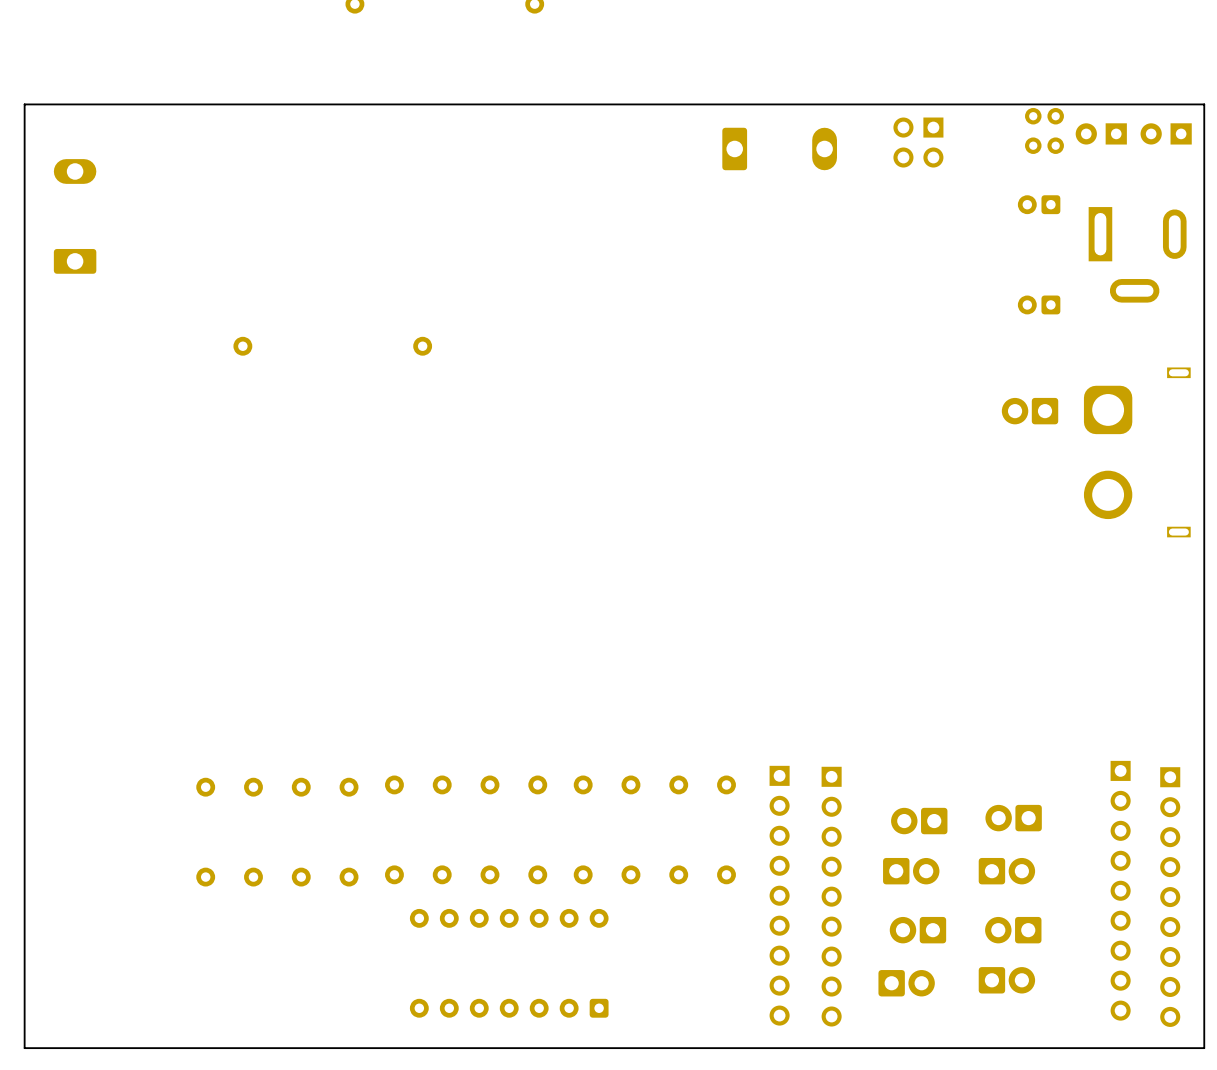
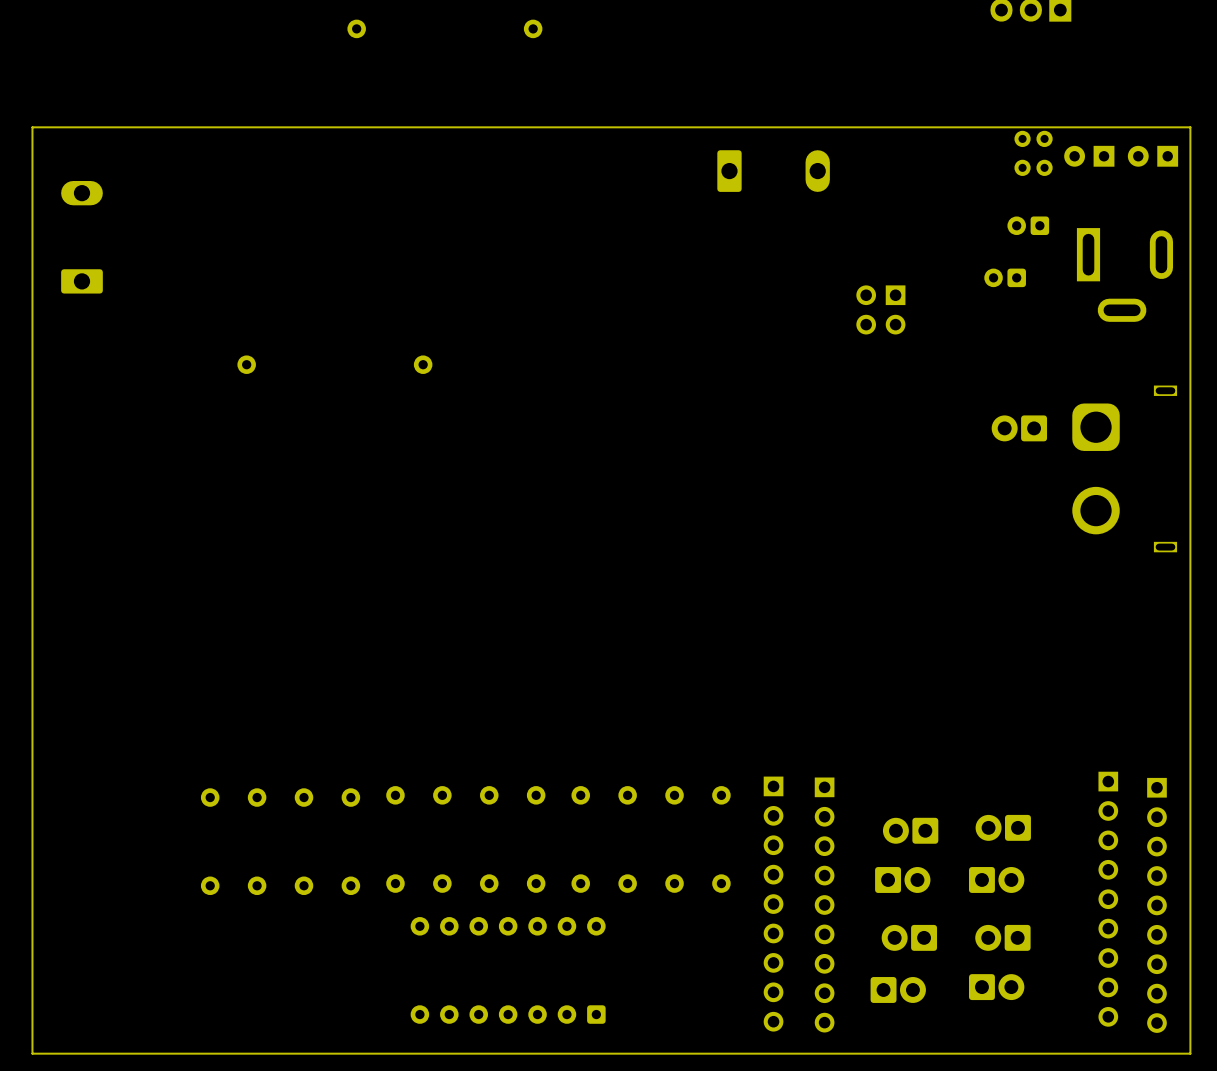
part position: (918, 142) -> (880, 309)
part position: (1039, 304) -> (1005, 277)

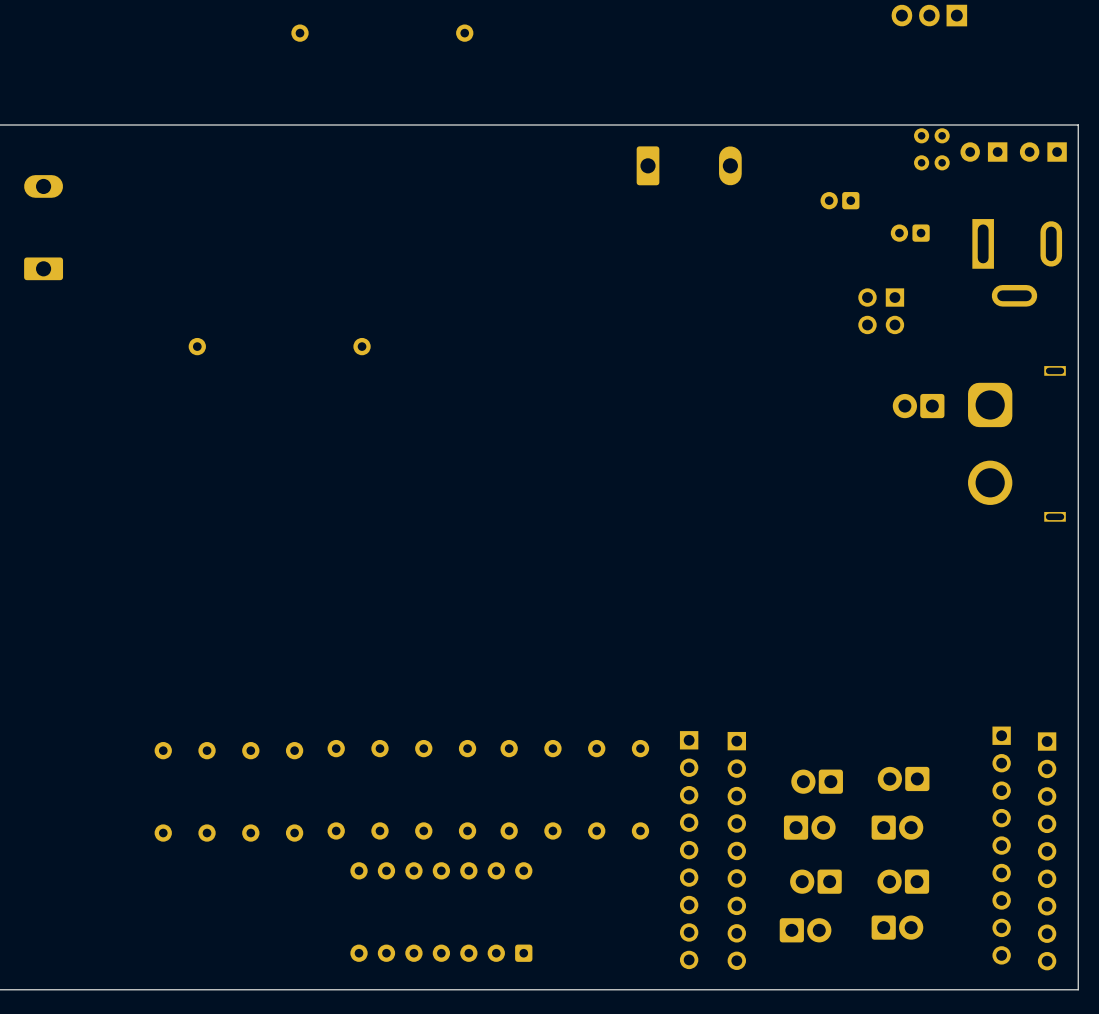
part: none -> (839, 200)
part: (1028, 225) -> none
part: none -> (910, 233)
part: (1005, 277) -> none
part position: (880, 309) -> (881, 311)

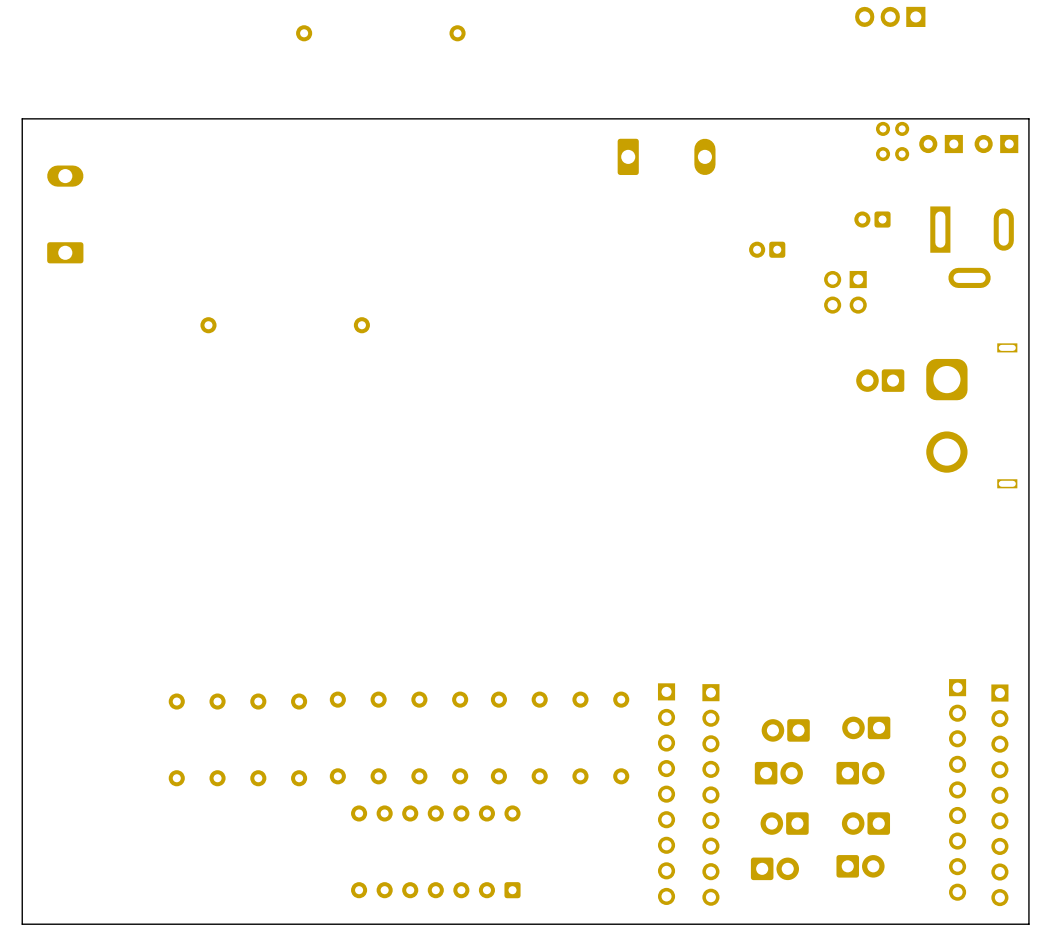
part position: (839, 200) -> (767, 249)

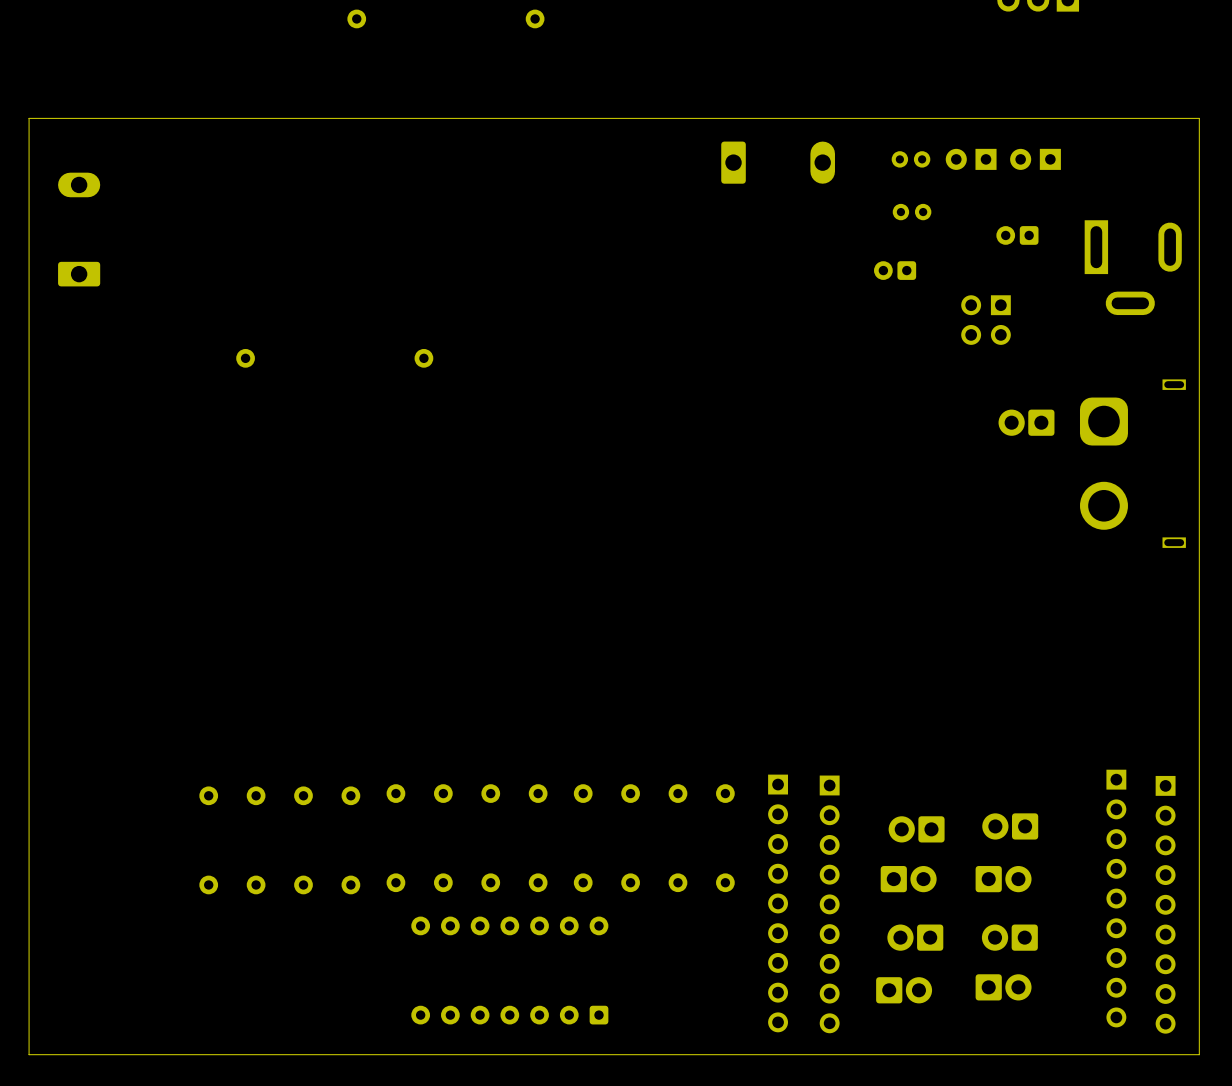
part: (892, 128) -> none
part: (941, 144) -> none
part: (996, 144) -> none
part footprint: [875, 147, 910, 162] -> [1010, 148, 1061, 170]
part: none -> (911, 159)
part: none -> (971, 159)
part: none -> (912, 212)

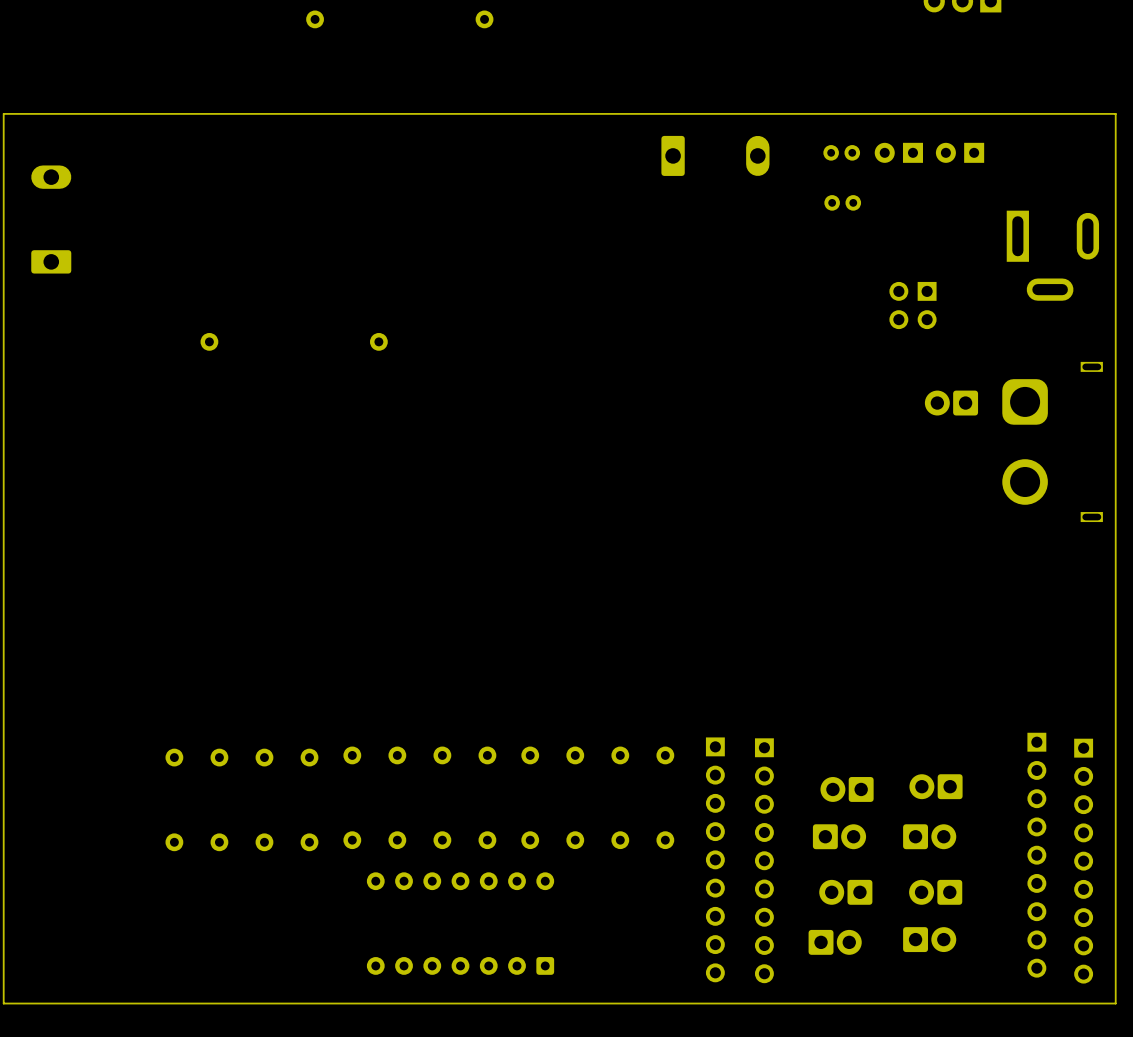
part: (1017, 235) -> none
part: (895, 270) -> none

